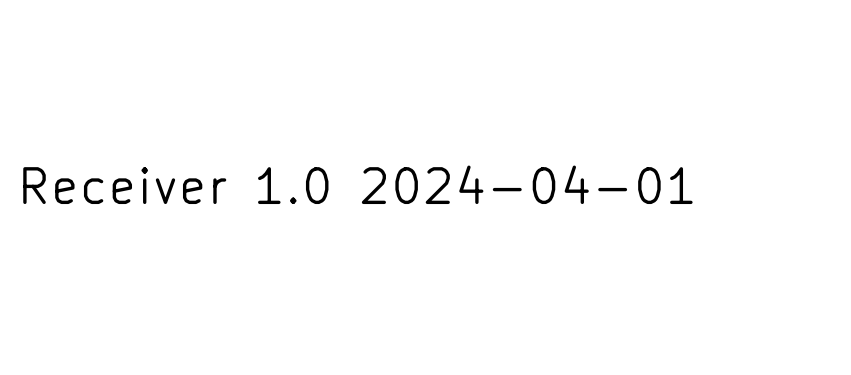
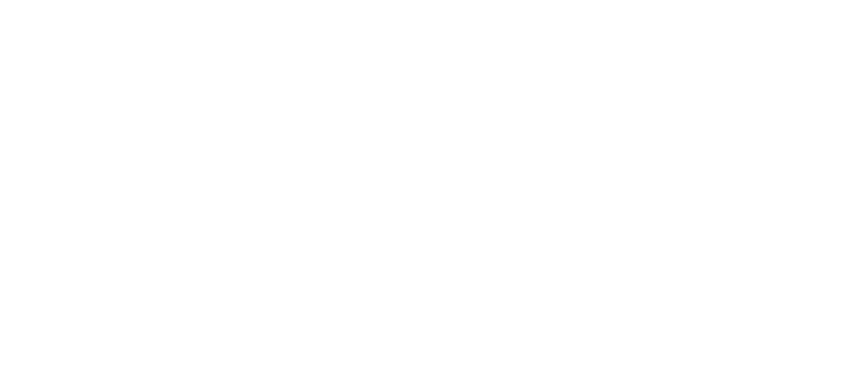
text: Receiver 1.0 2024-04-01 (357, 184) -> none

